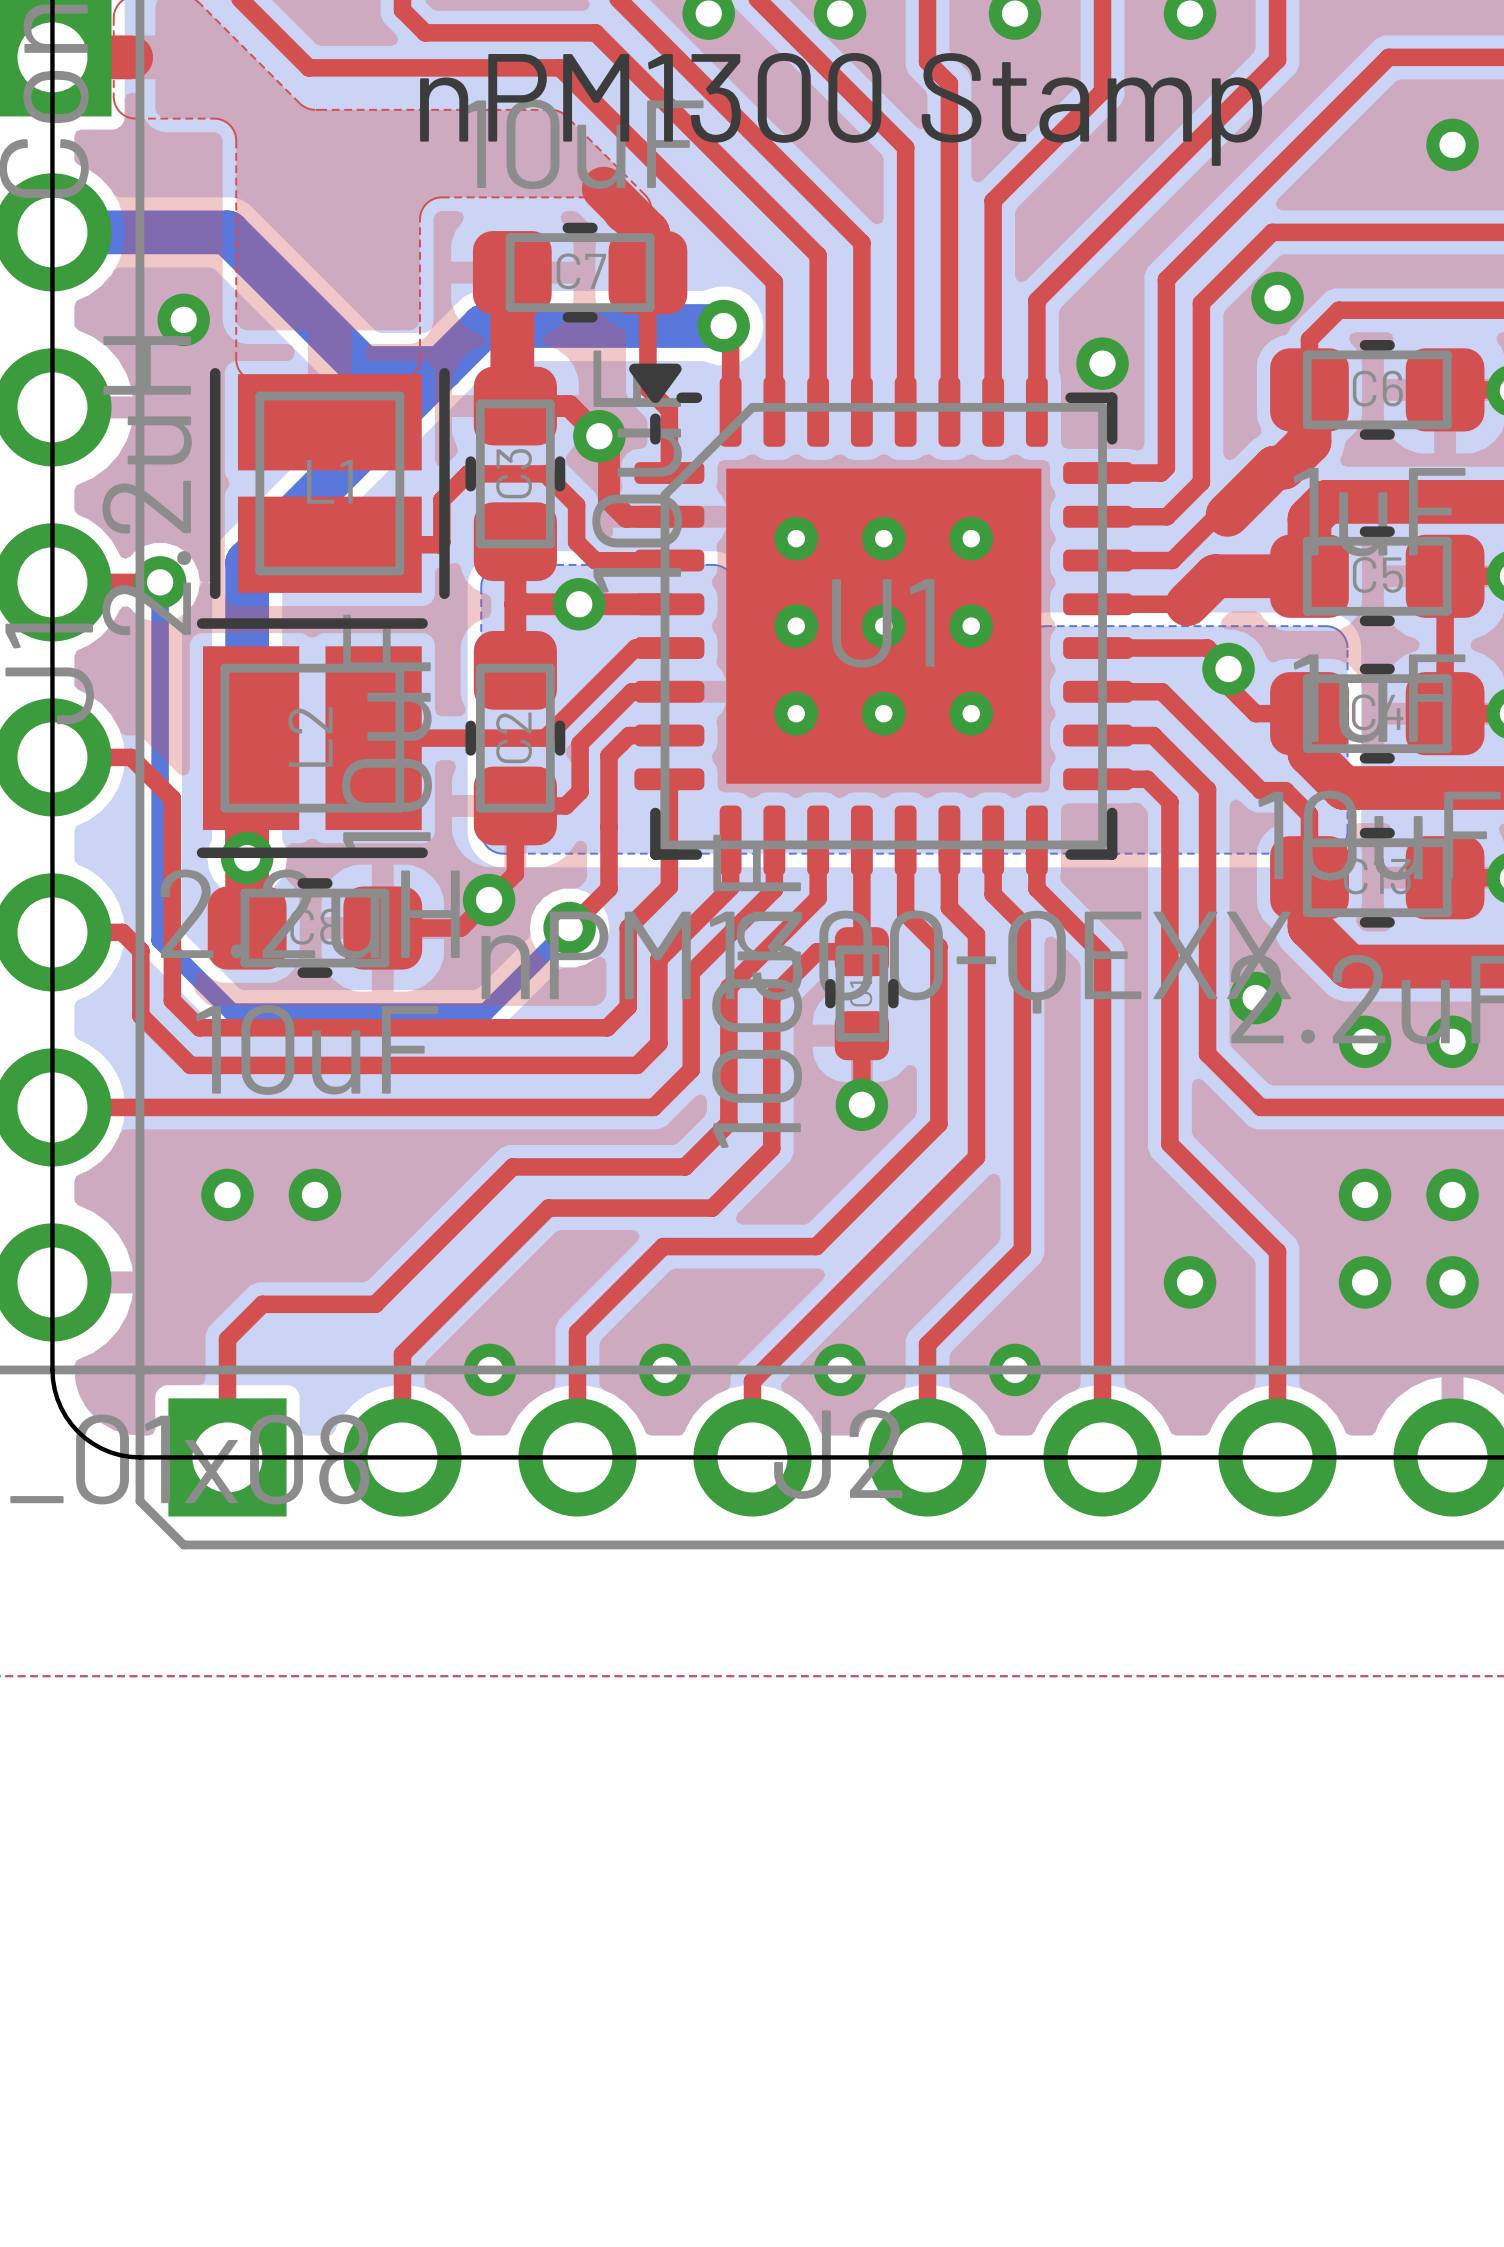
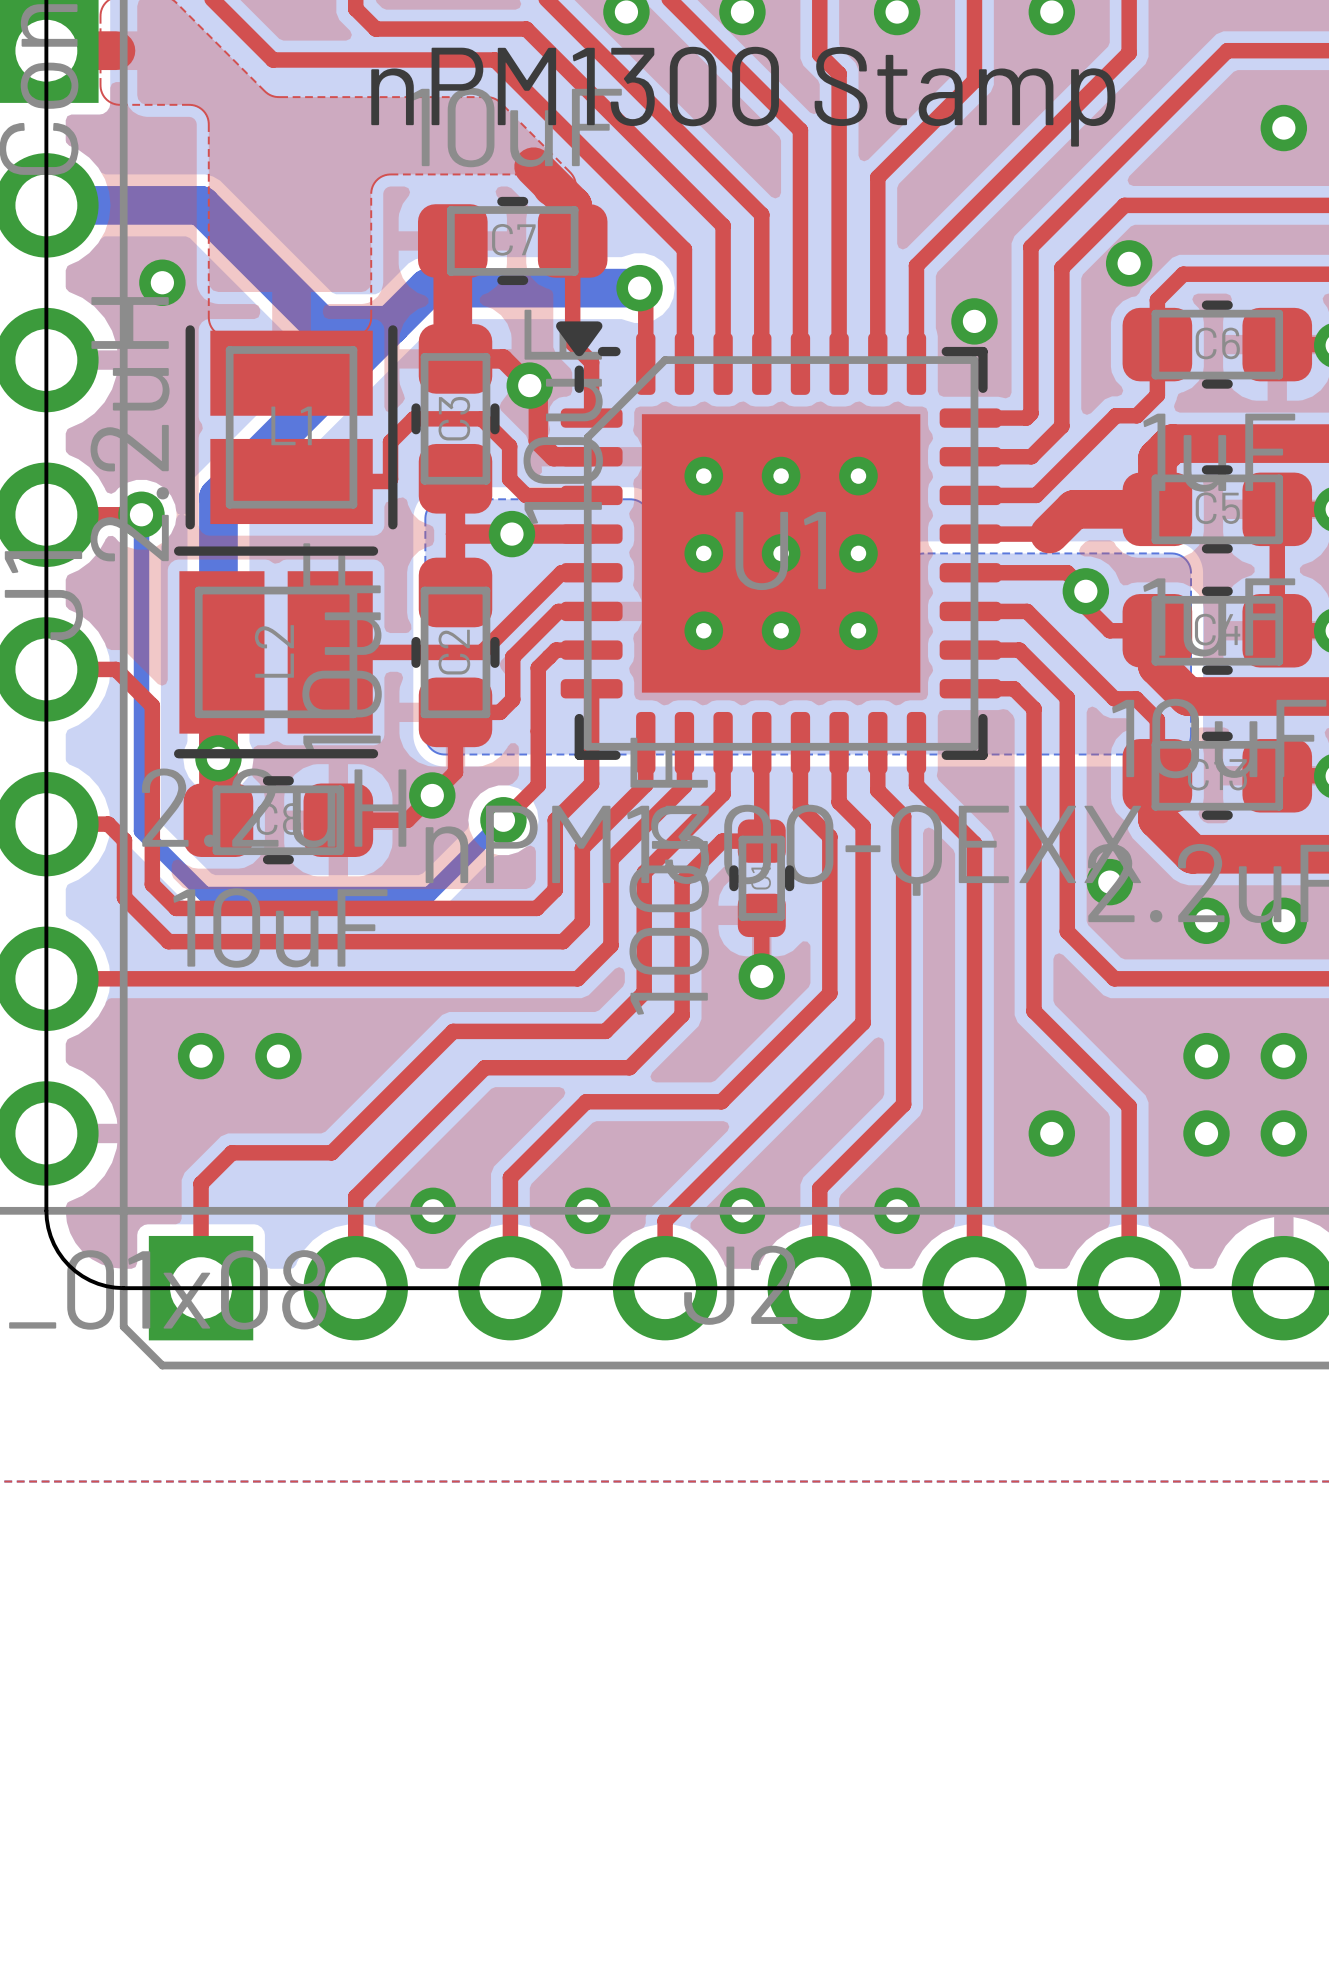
top track: (1309, 389) (1309, 441) (1283, 467) (1274, 467) (1227, 514) -> none

